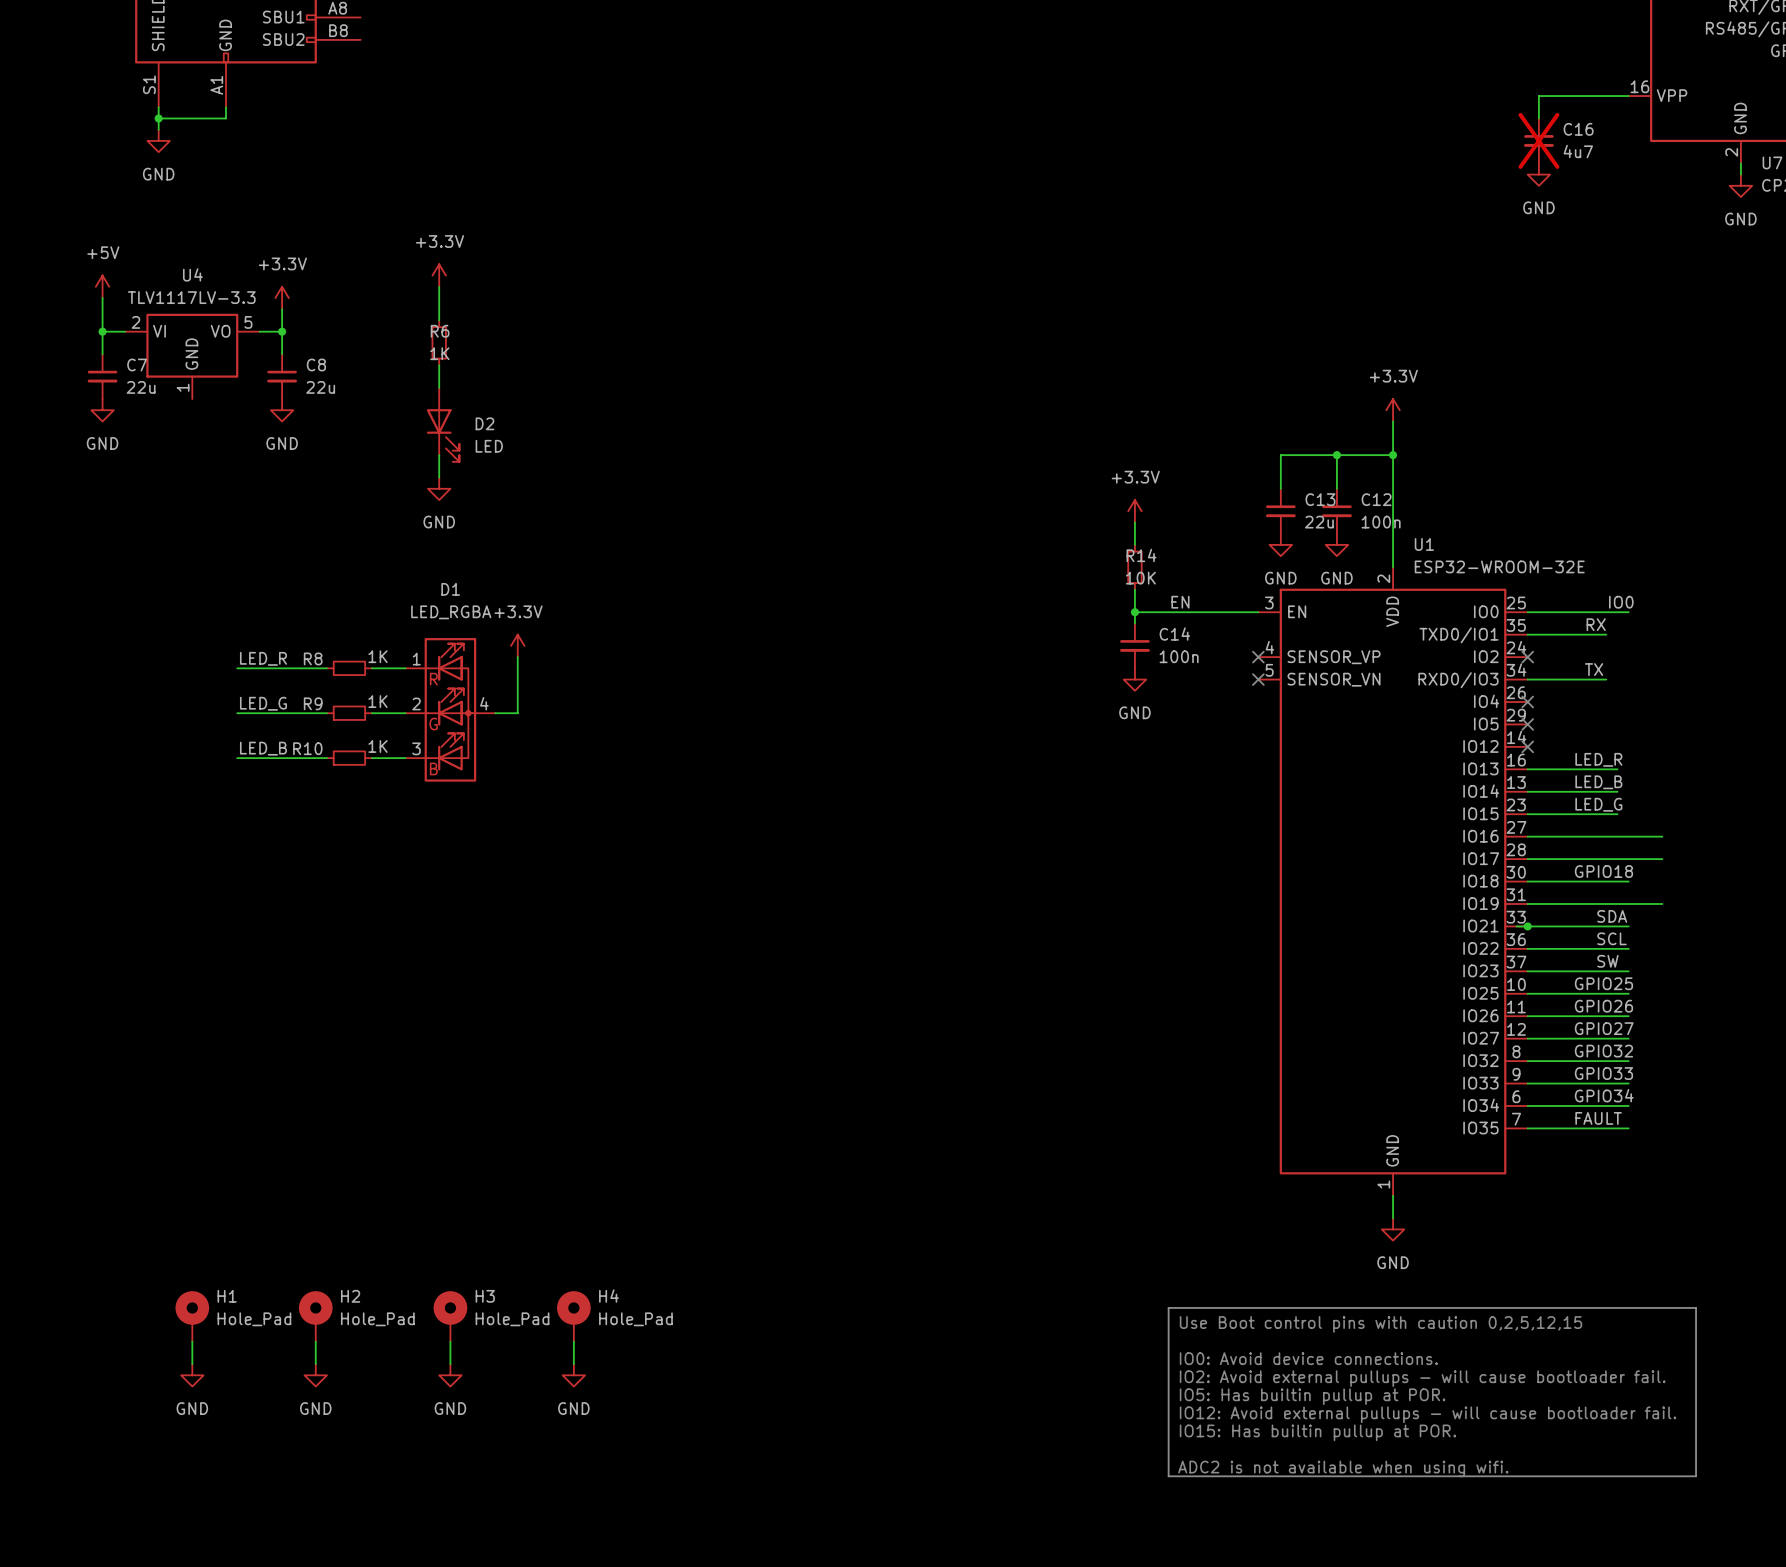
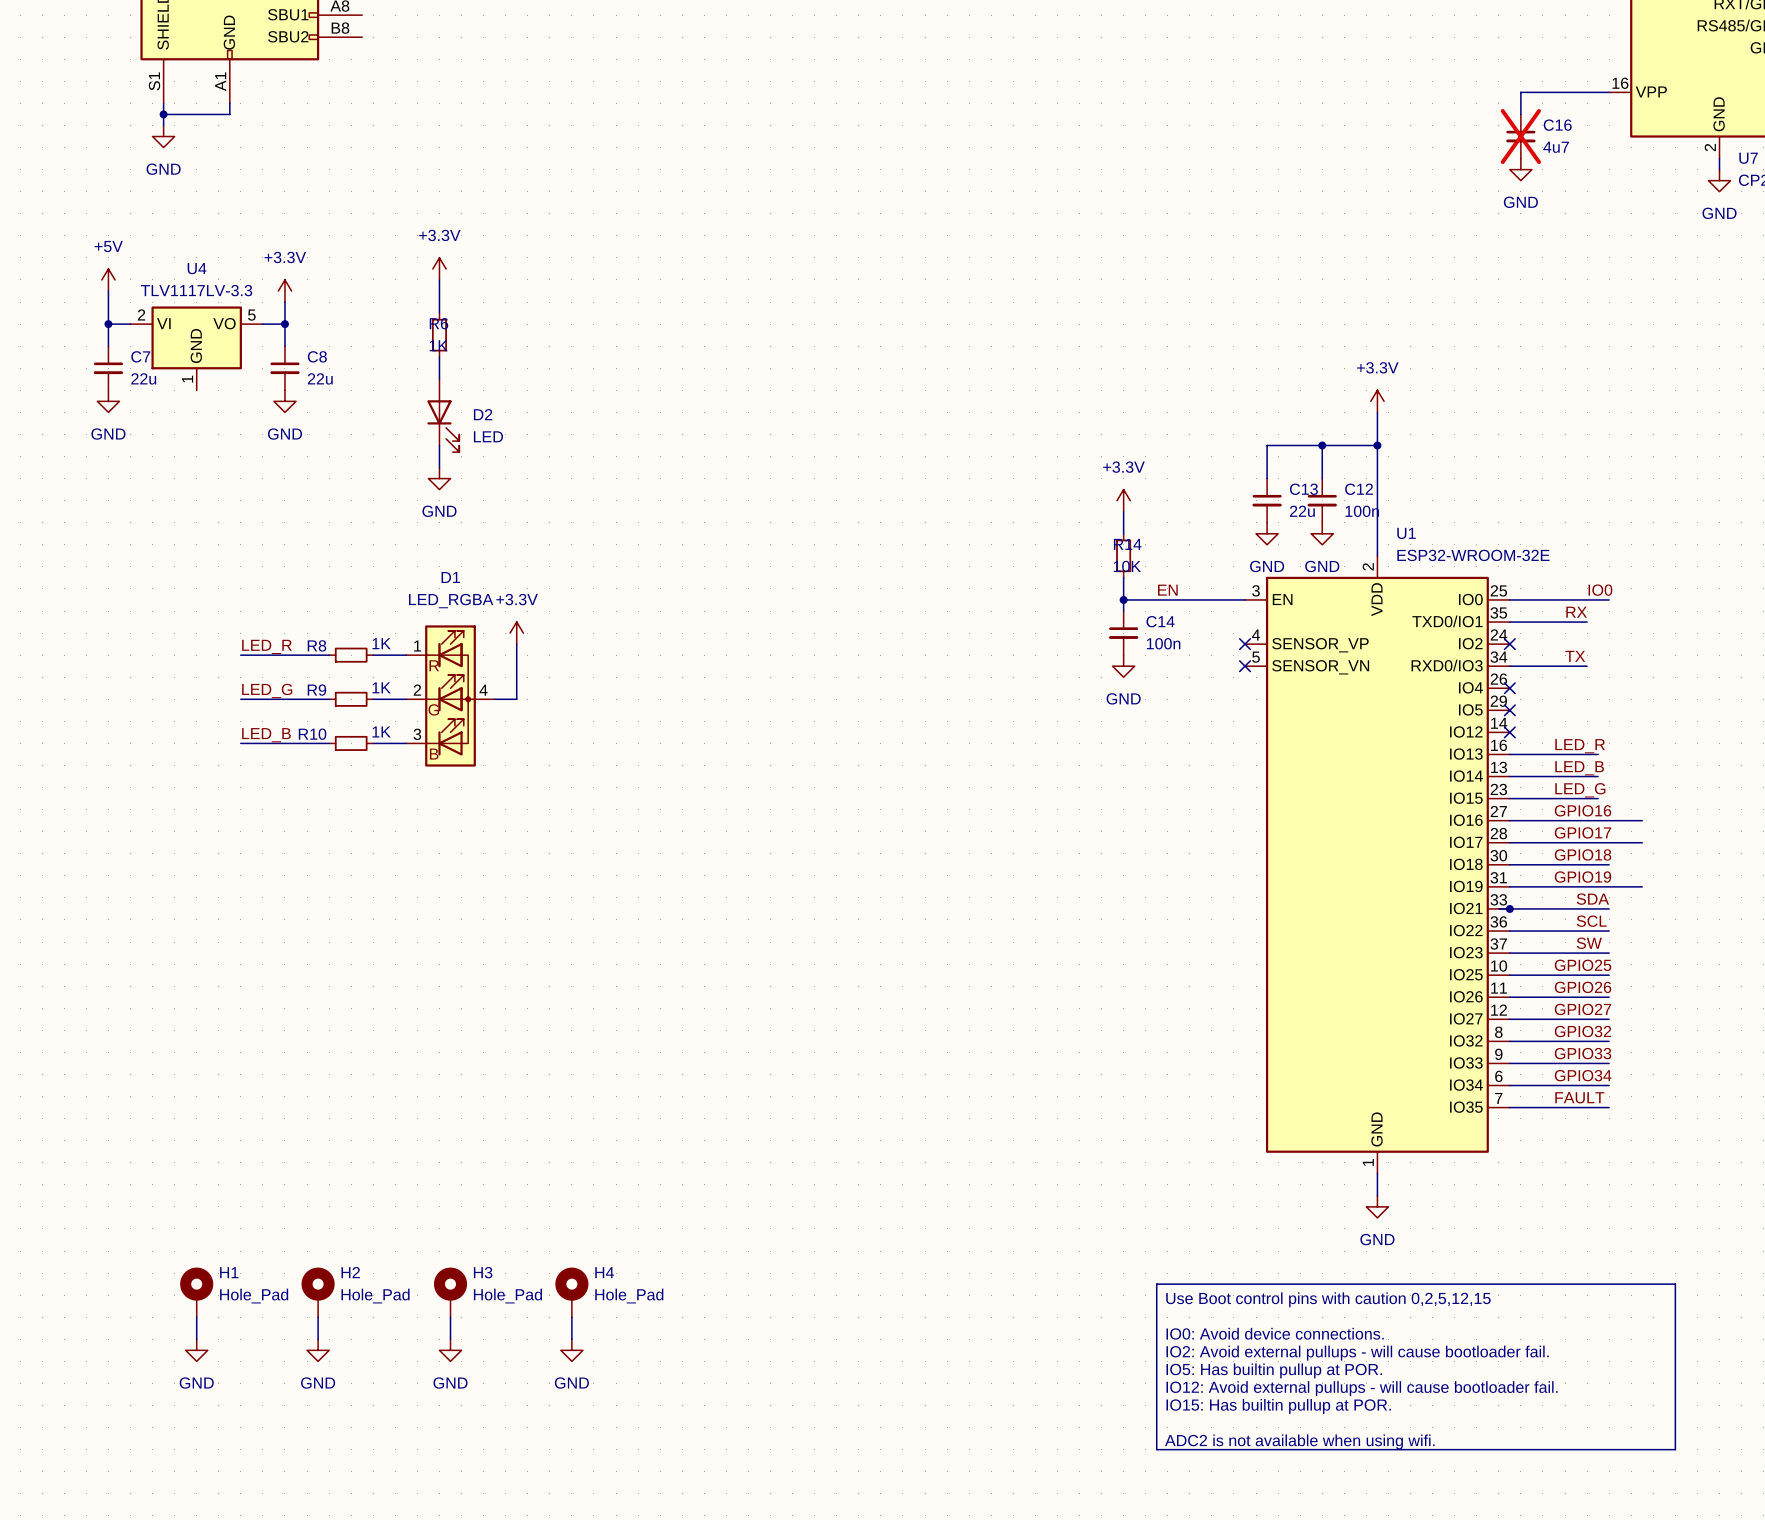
label: none -> GPIO16 (1583, 810)
label: none -> GPIO17 (1582, 832)
label: none -> GPIO19 (1582, 877)

